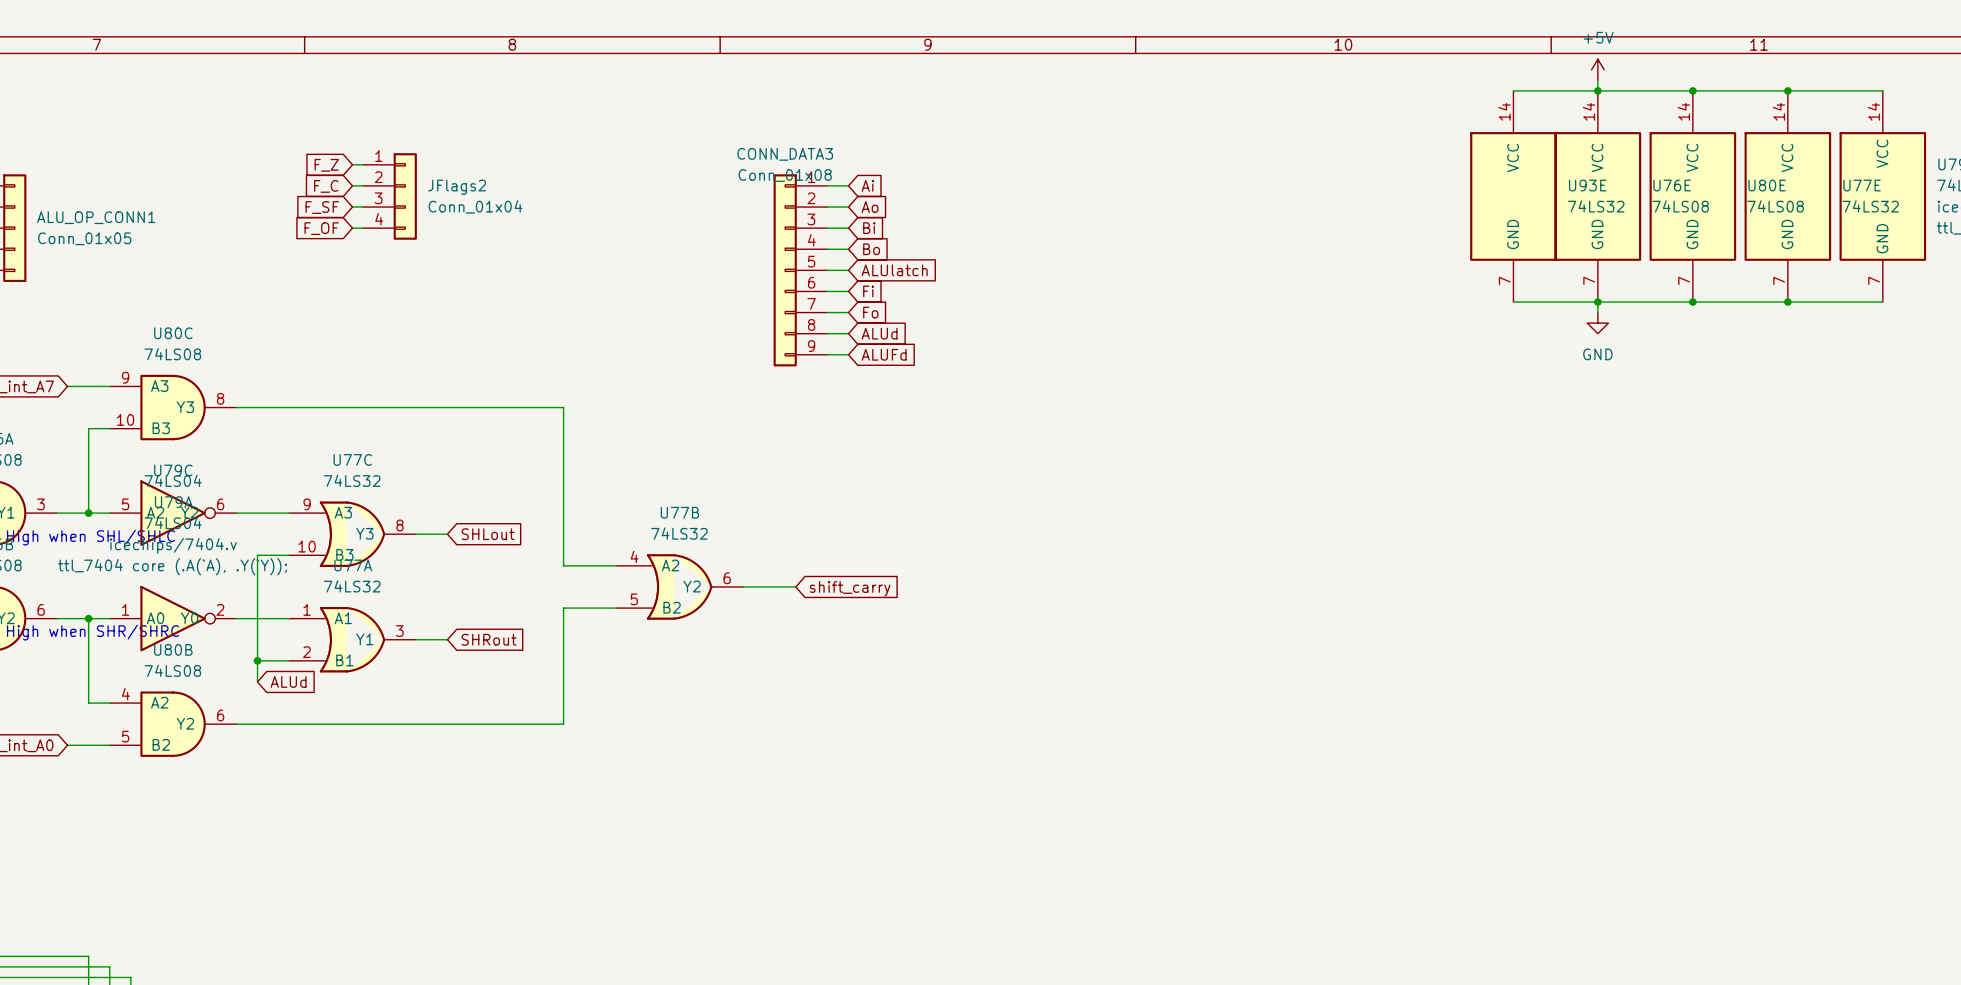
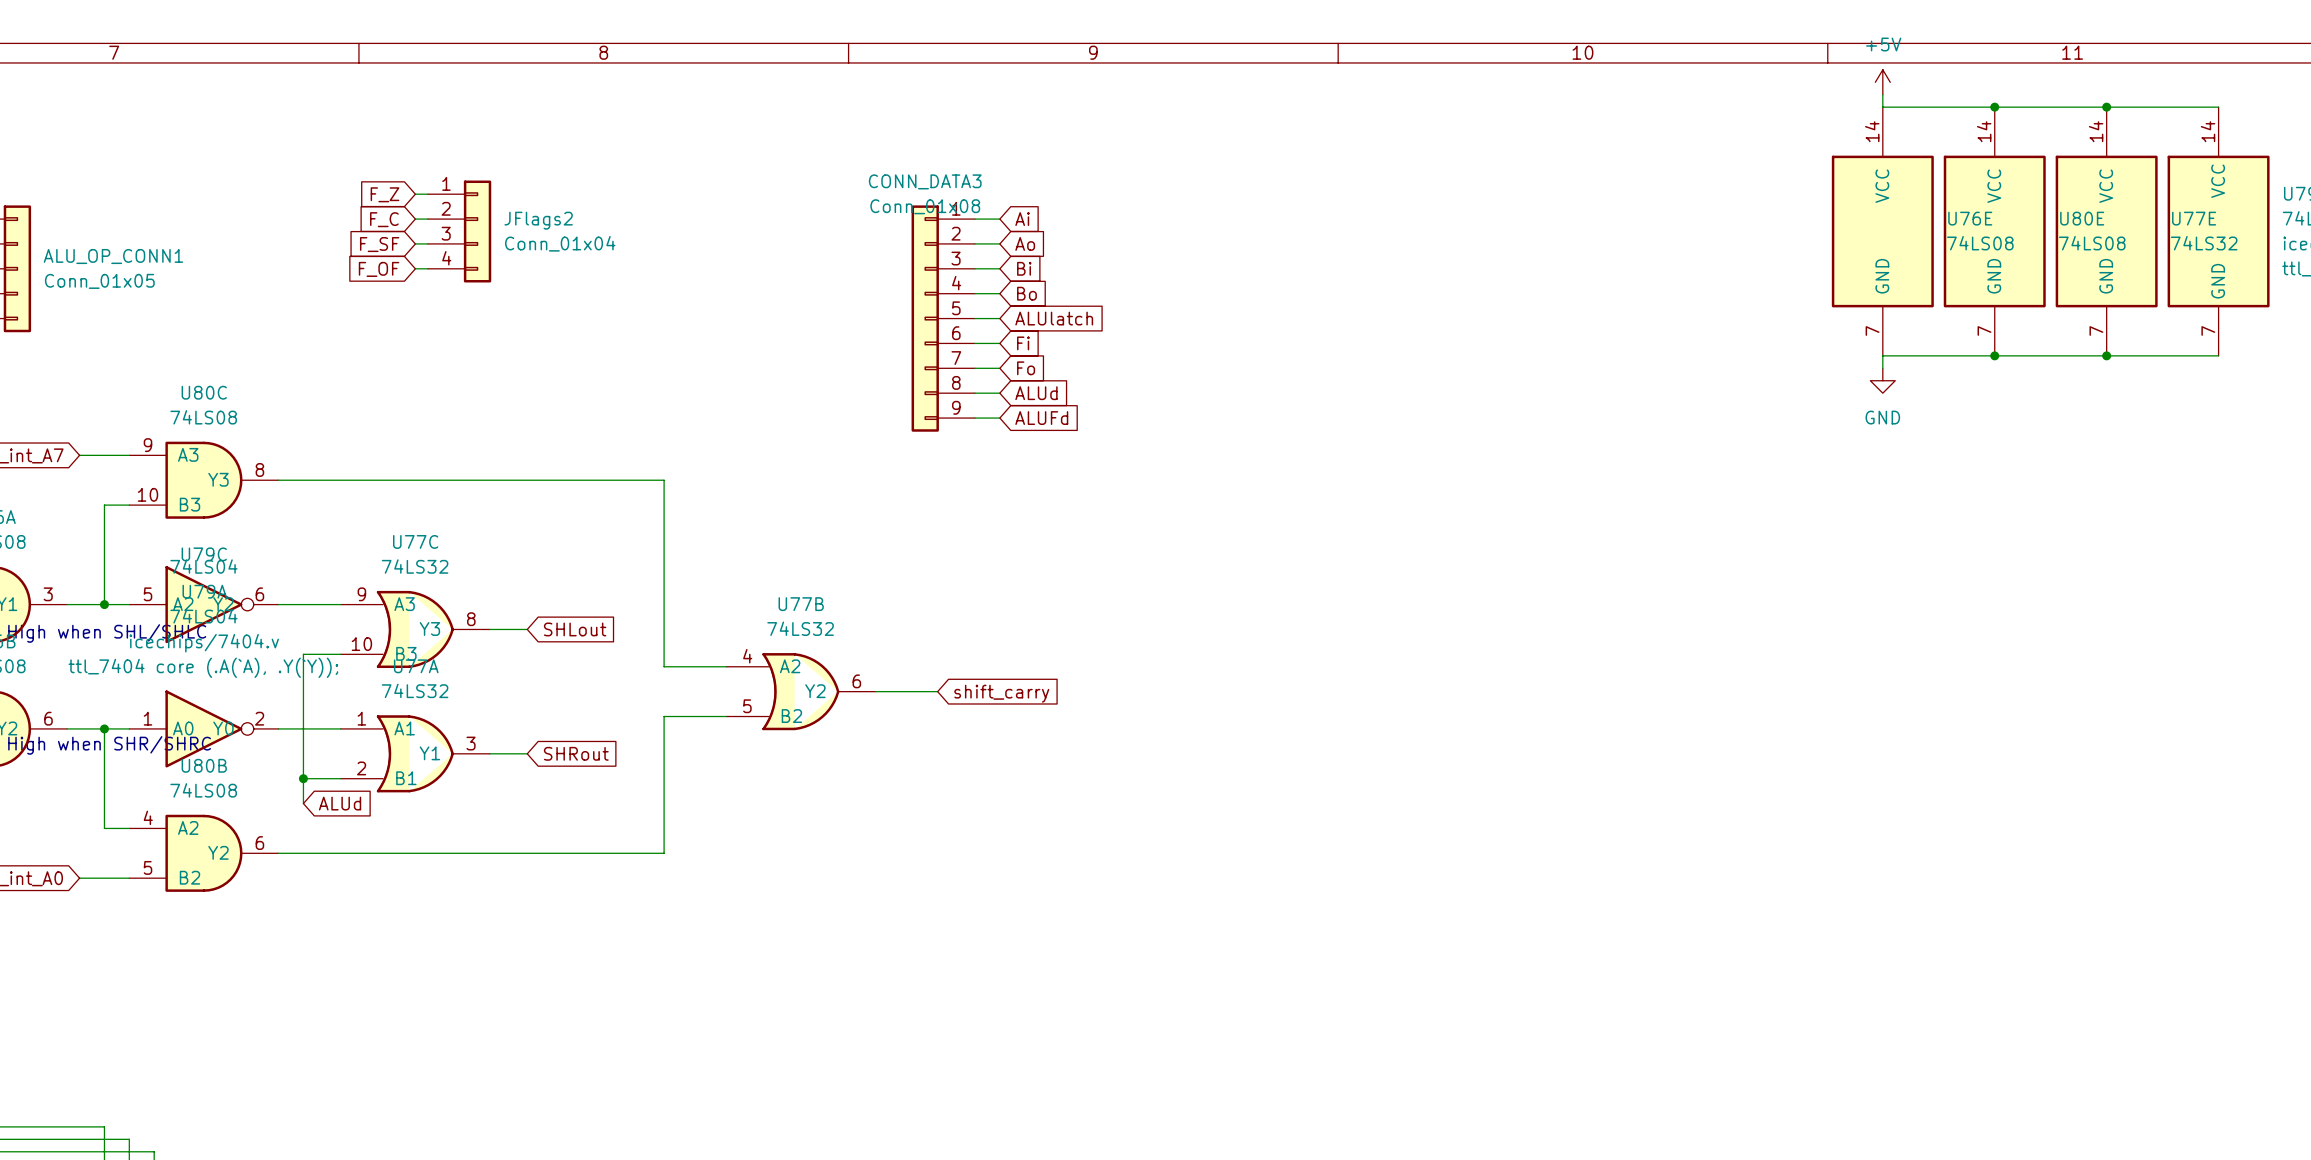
wire: (1513, 90) (1597, 90) -> none
junction: (1597, 90) -> none
U93E: 74LS32 (1513, 196) -> none
wire: (1513, 302) (1597, 302) -> none
junction: (1597, 302) -> none

